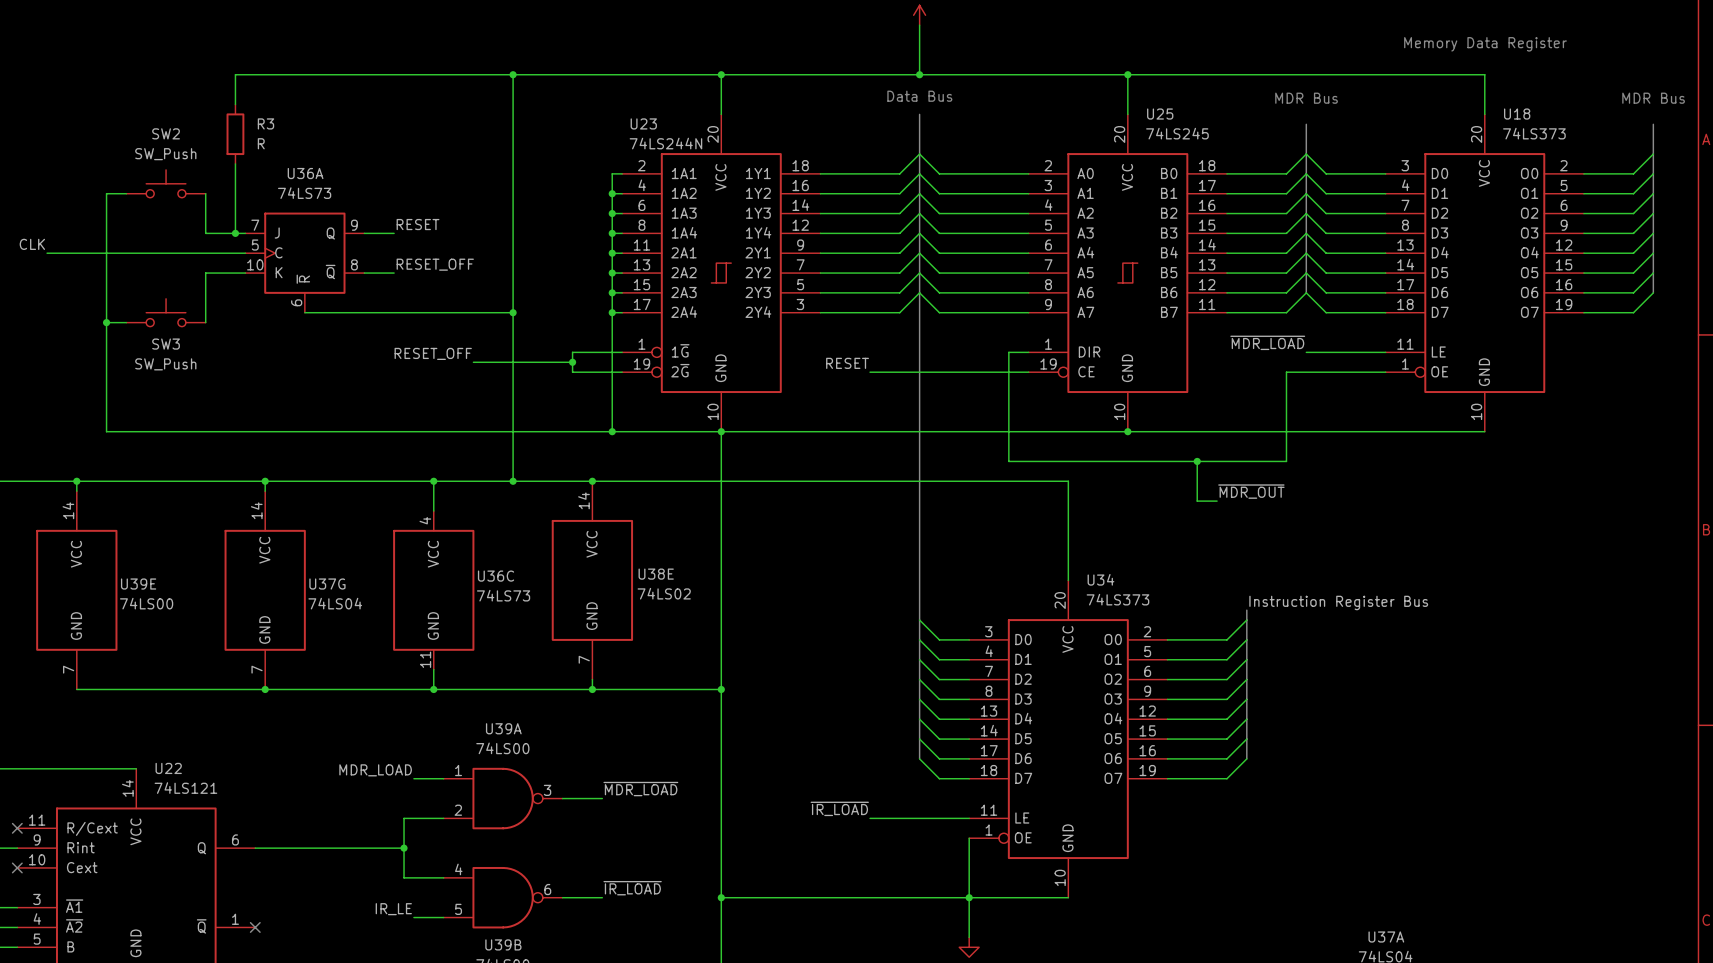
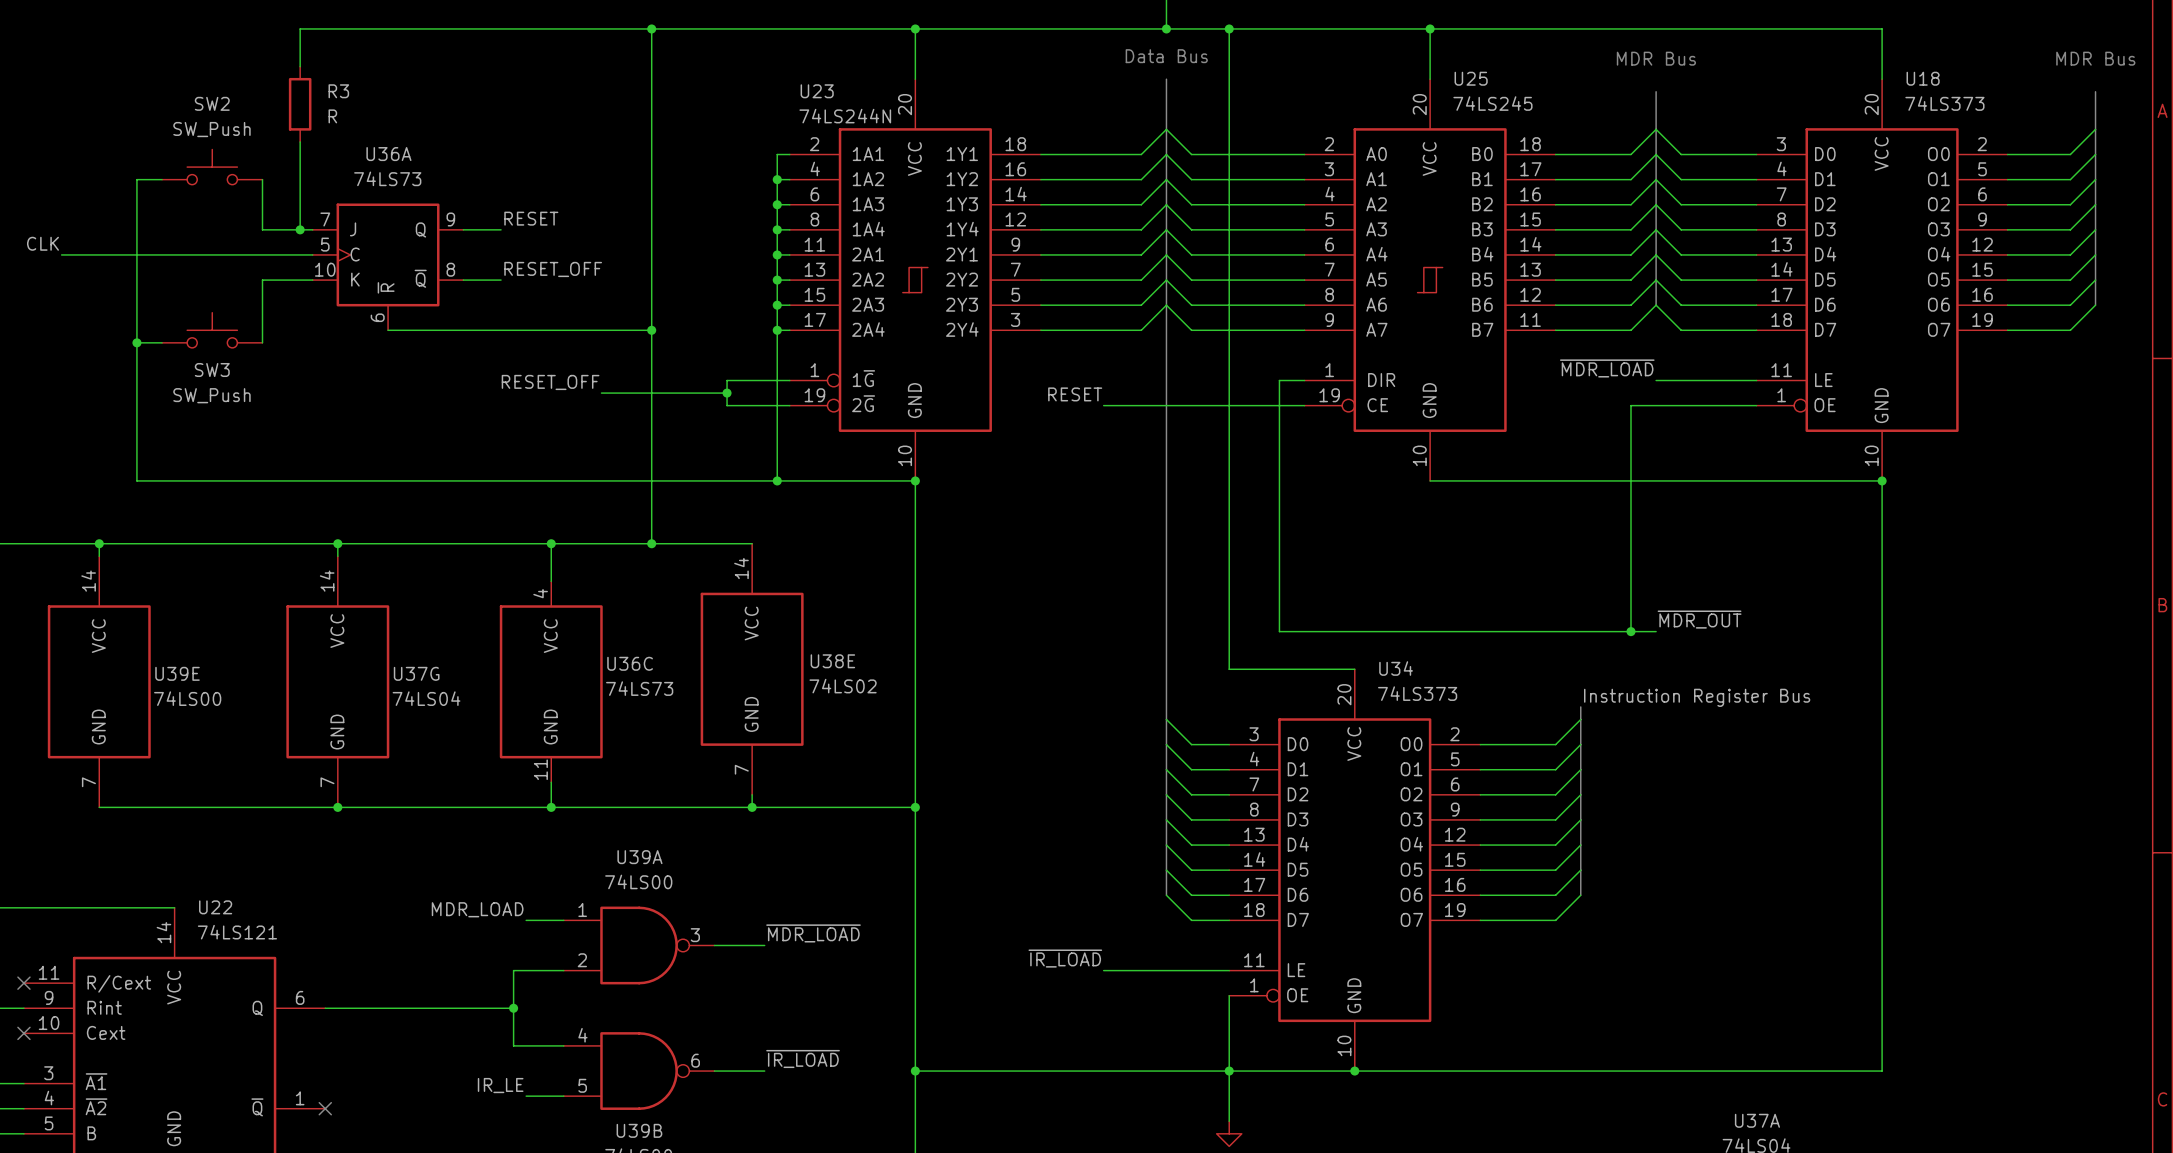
junction: none -> (1229, 28)
wire: (721, 431) (1127, 431) -> none
junction: (1127, 431) -> none
wire: none -> (1882, 480) (1882, 1071) (1354, 1071)
junction: none -> (1882, 480)
wire: (1008, 461) (1286, 461) -> (1279, 518) (1279, 631) (1656, 631)
wire: (1197, 461) (1197, 501) (1217, 501) -> none
junction: (1197, 461) -> none
wire: none -> (1630, 518) (1630, 631)
wire: (592, 481) (1068, 481) (1068, 580) -> (1229, 28) (1229, 669) (1354, 669)
junction: (592, 481) -> none
label position: ~{MDR_OUT} (1251, 491) -> ~{MDR_OUT} (1699, 619)
junction: none -> (1630, 631)
junction: none -> (1354, 1071)

